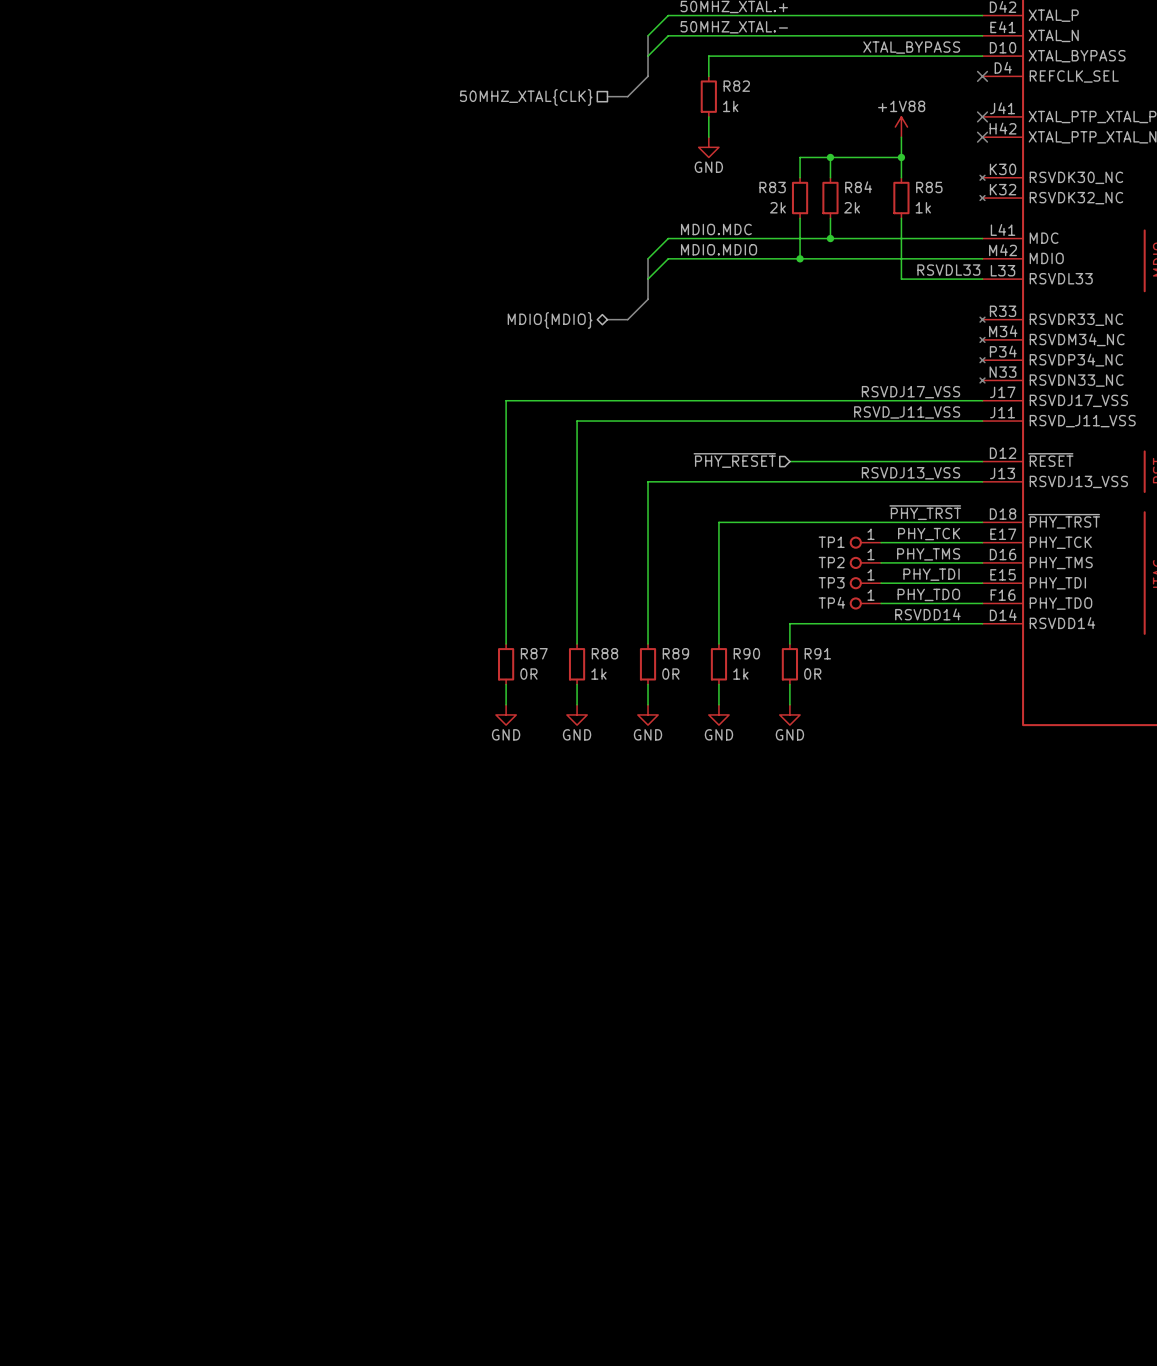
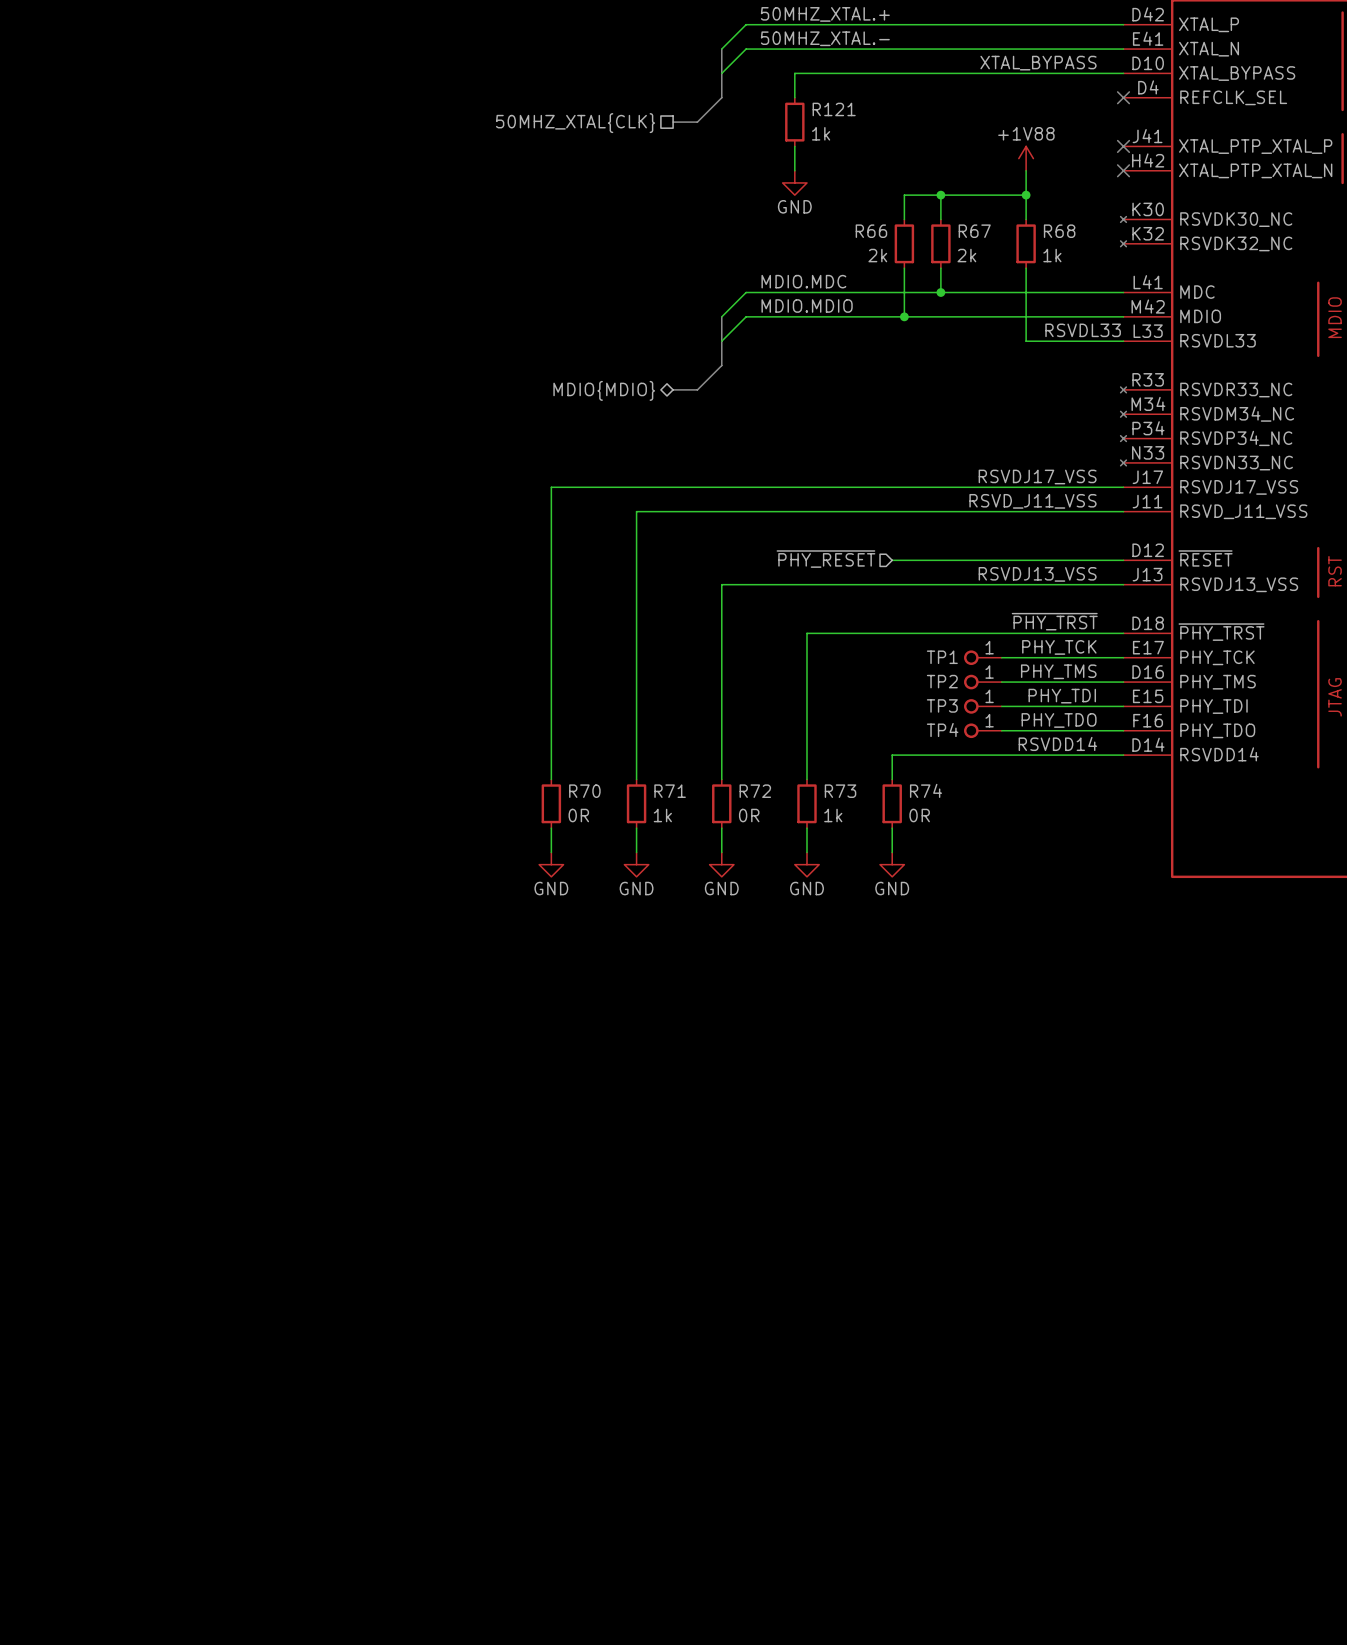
R82 name: R82 (736, 86) -> R121 (834, 109)
R83 name: R83 (772, 187) -> R66 (871, 231)
R84 name: R84 (858, 187) -> R67 (974, 231)
R85 name: R85 (929, 187) -> R68 (1059, 231)
R87 name: R87 (534, 653) -> R70 (584, 791)
R88 name: R88 (604, 653) -> R71 (670, 791)
R89 name: R89 (675, 653) -> R72 (755, 791)
R90 name: R90 (746, 653) -> R73 (840, 791)
R91 name: R91 (817, 653) -> R74 (926, 790)

